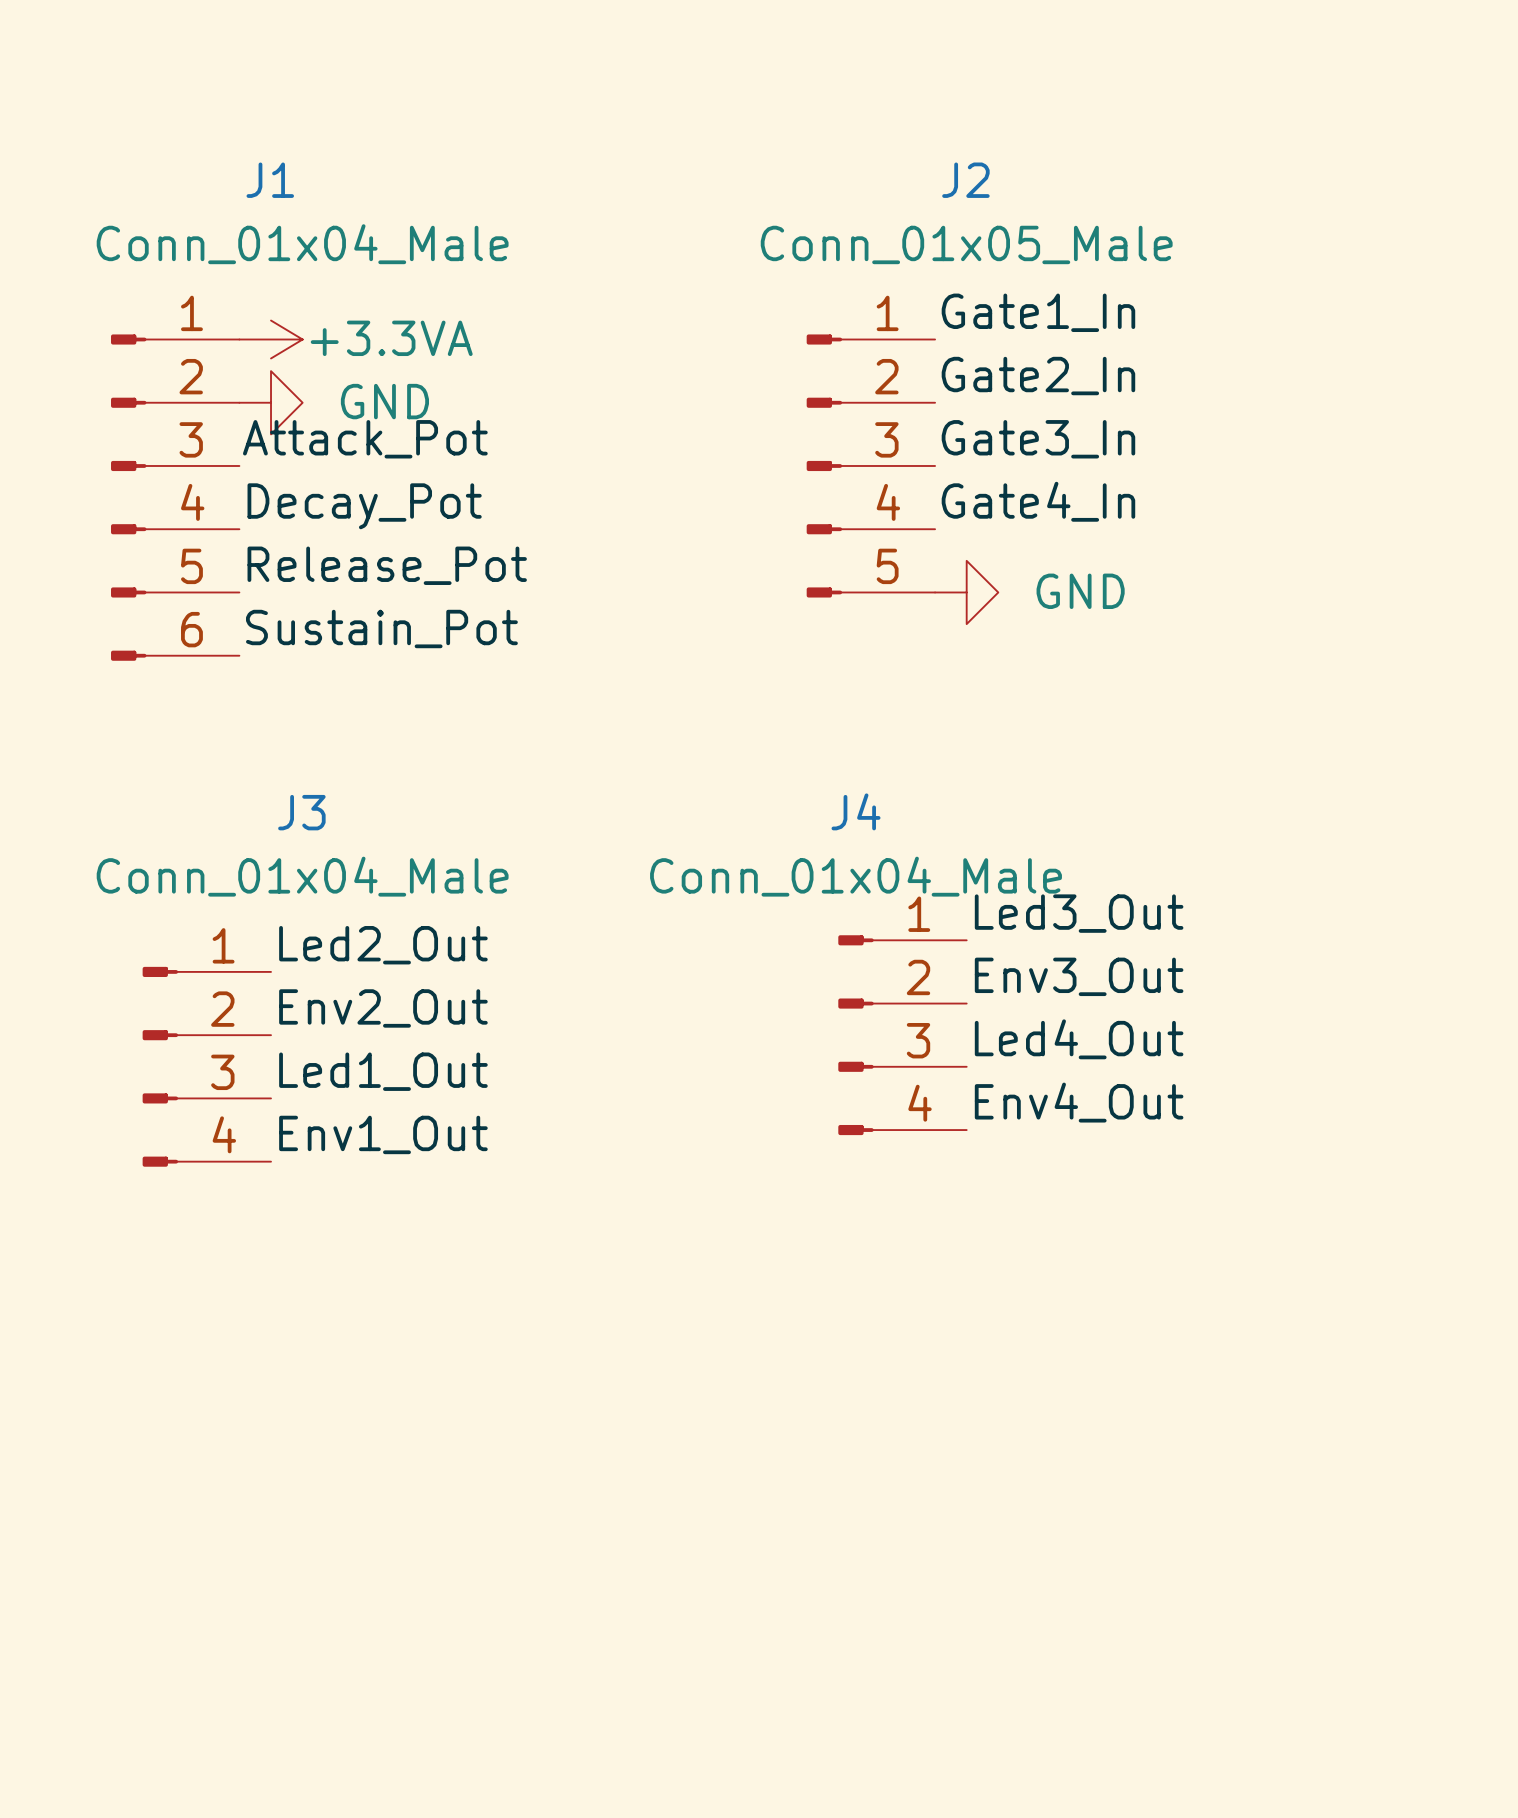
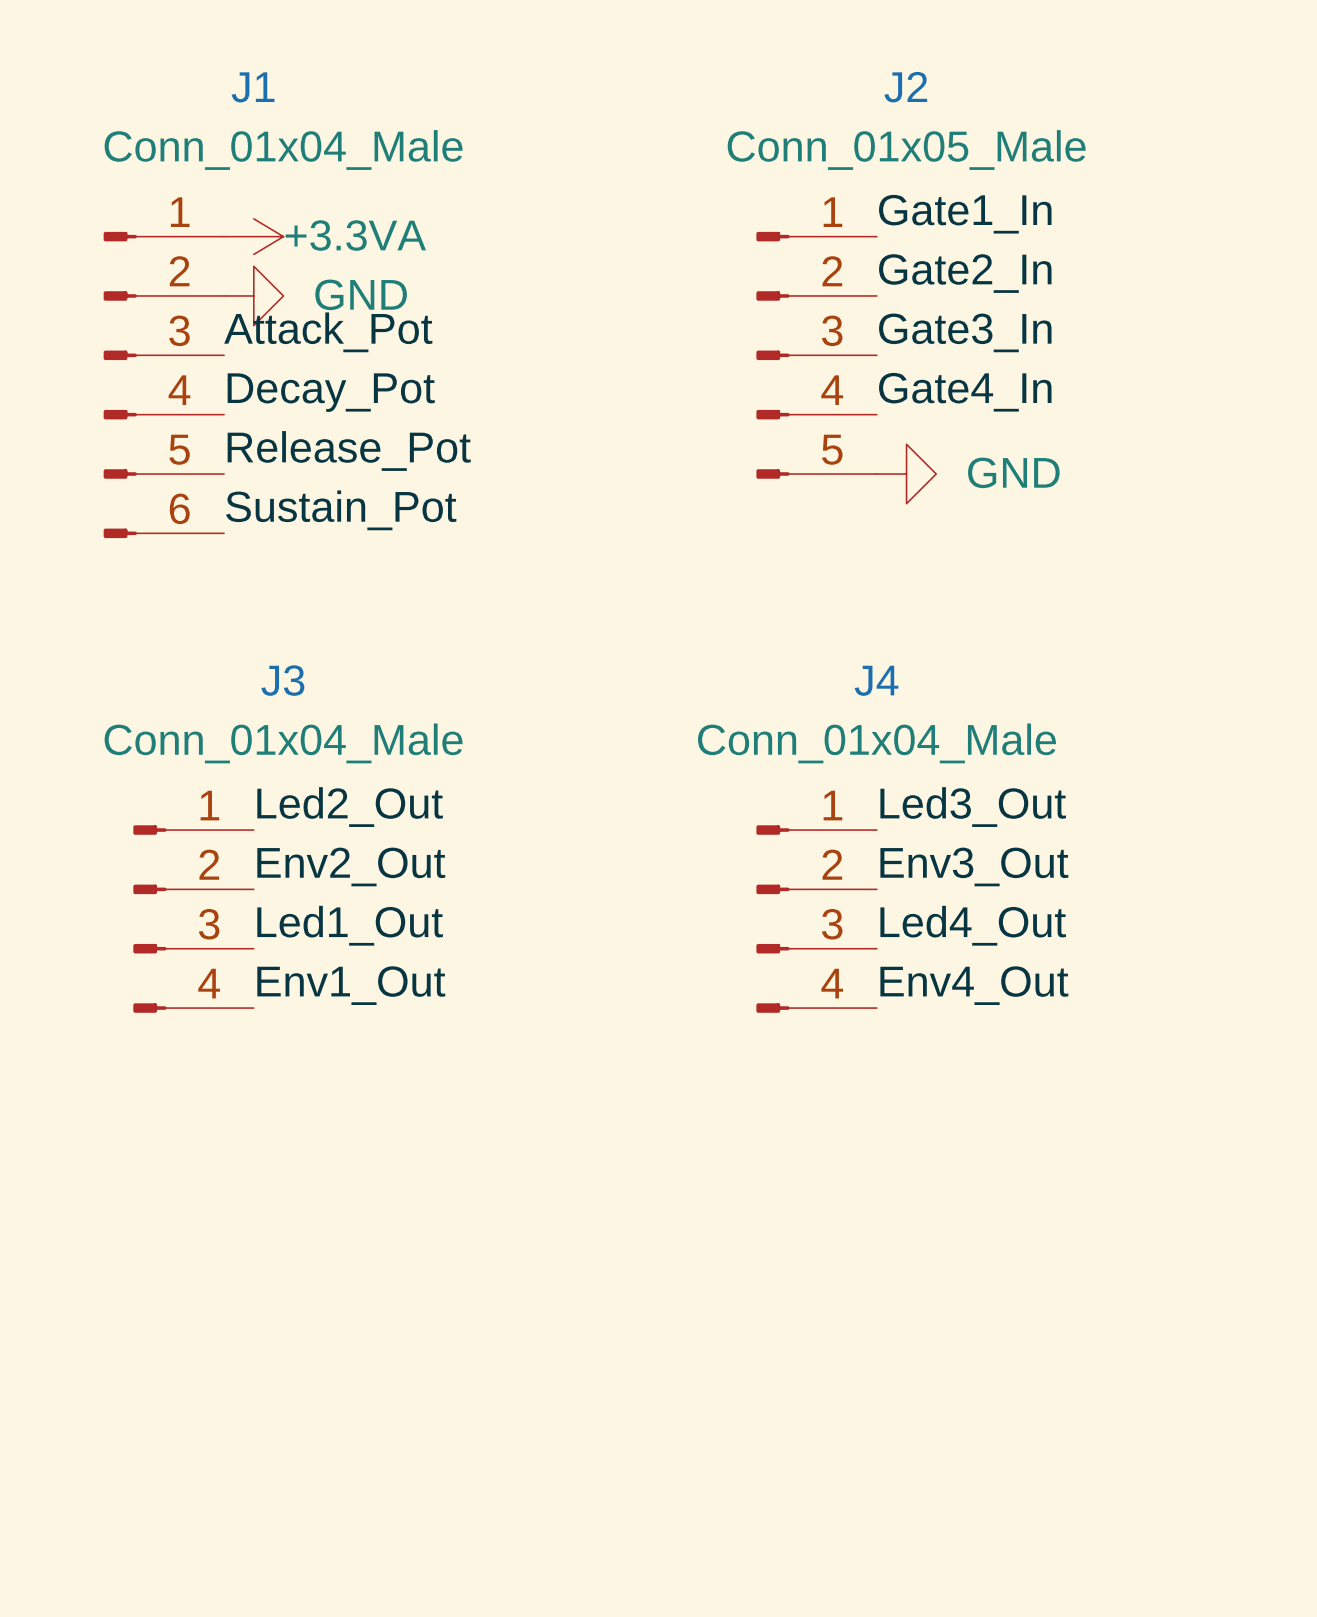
J4 name position: J4 (856, 811) -> J4 (876, 680)
J4 value position: Conn_01x04_Male (856, 876) -> Conn_01x04_Male (877, 743)
label position: Led3_Out (1079, 913) -> Led3_Out (973, 807)
label position: Env3_Out (1079, 976) -> Env3_Out (974, 866)
J4 position: (902, 1035) -> (816, 919)
label position: Led4_Out (1079, 1039) -> Led4_Out (973, 925)
label position: Env4_Out (1079, 1102) -> Env4_Out (974, 985)

